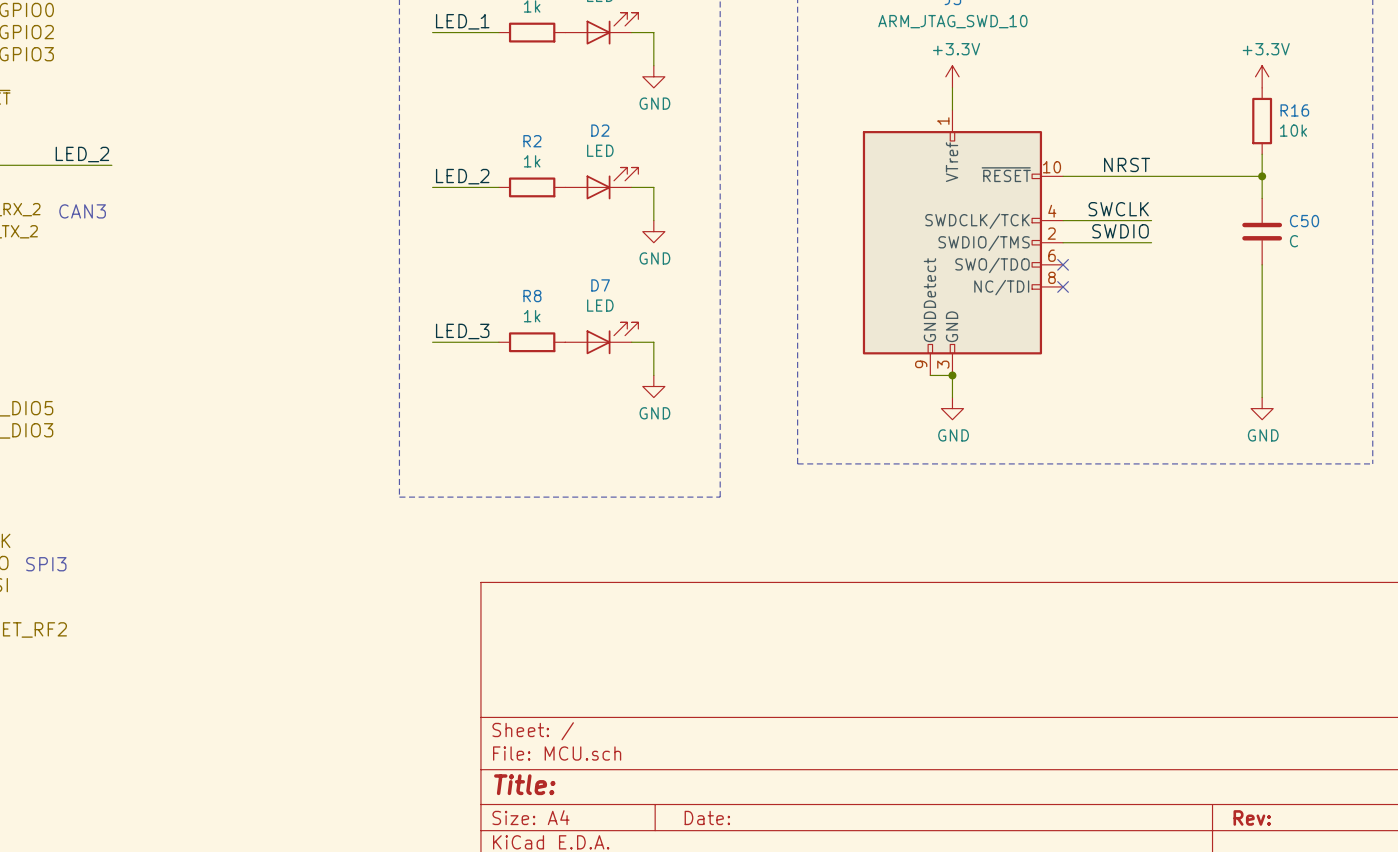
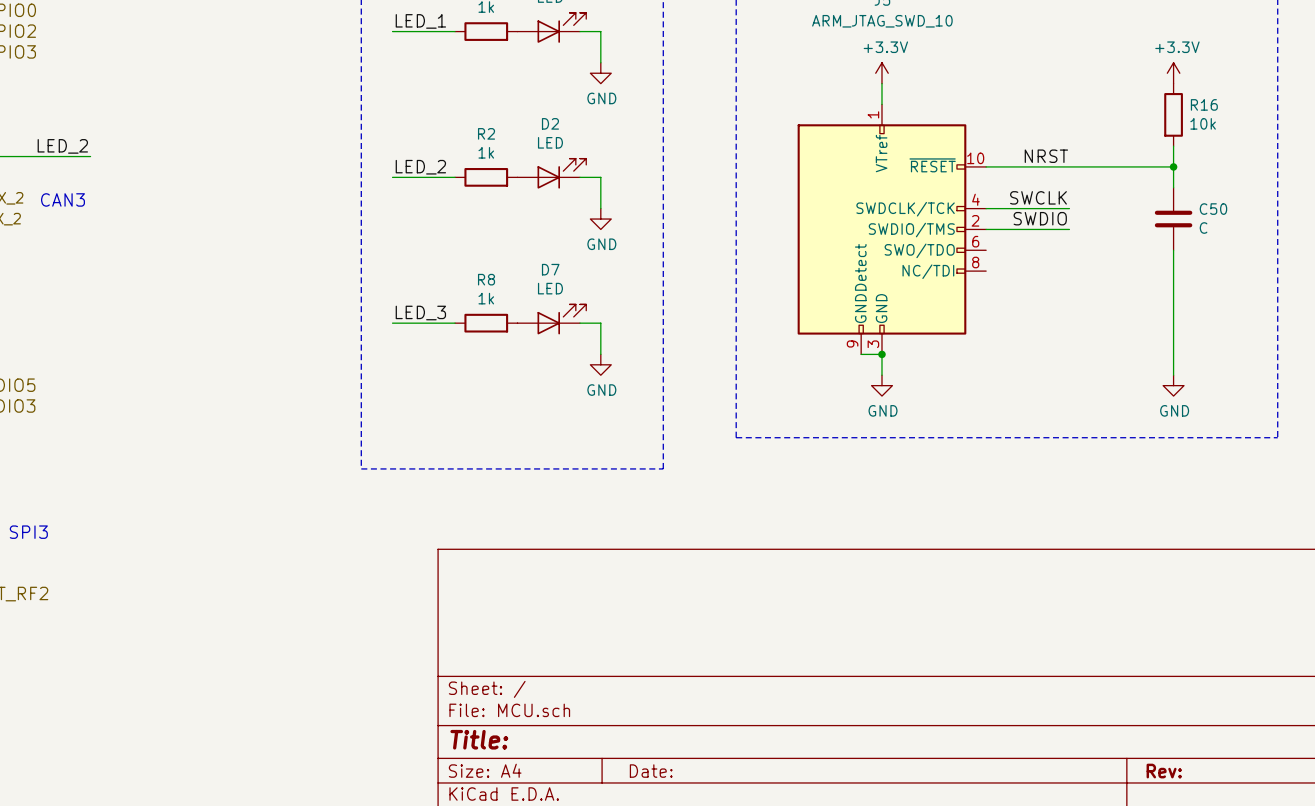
no-connect mark: (1063, 264) -> none
no-connect mark: (1063, 286) -> none

